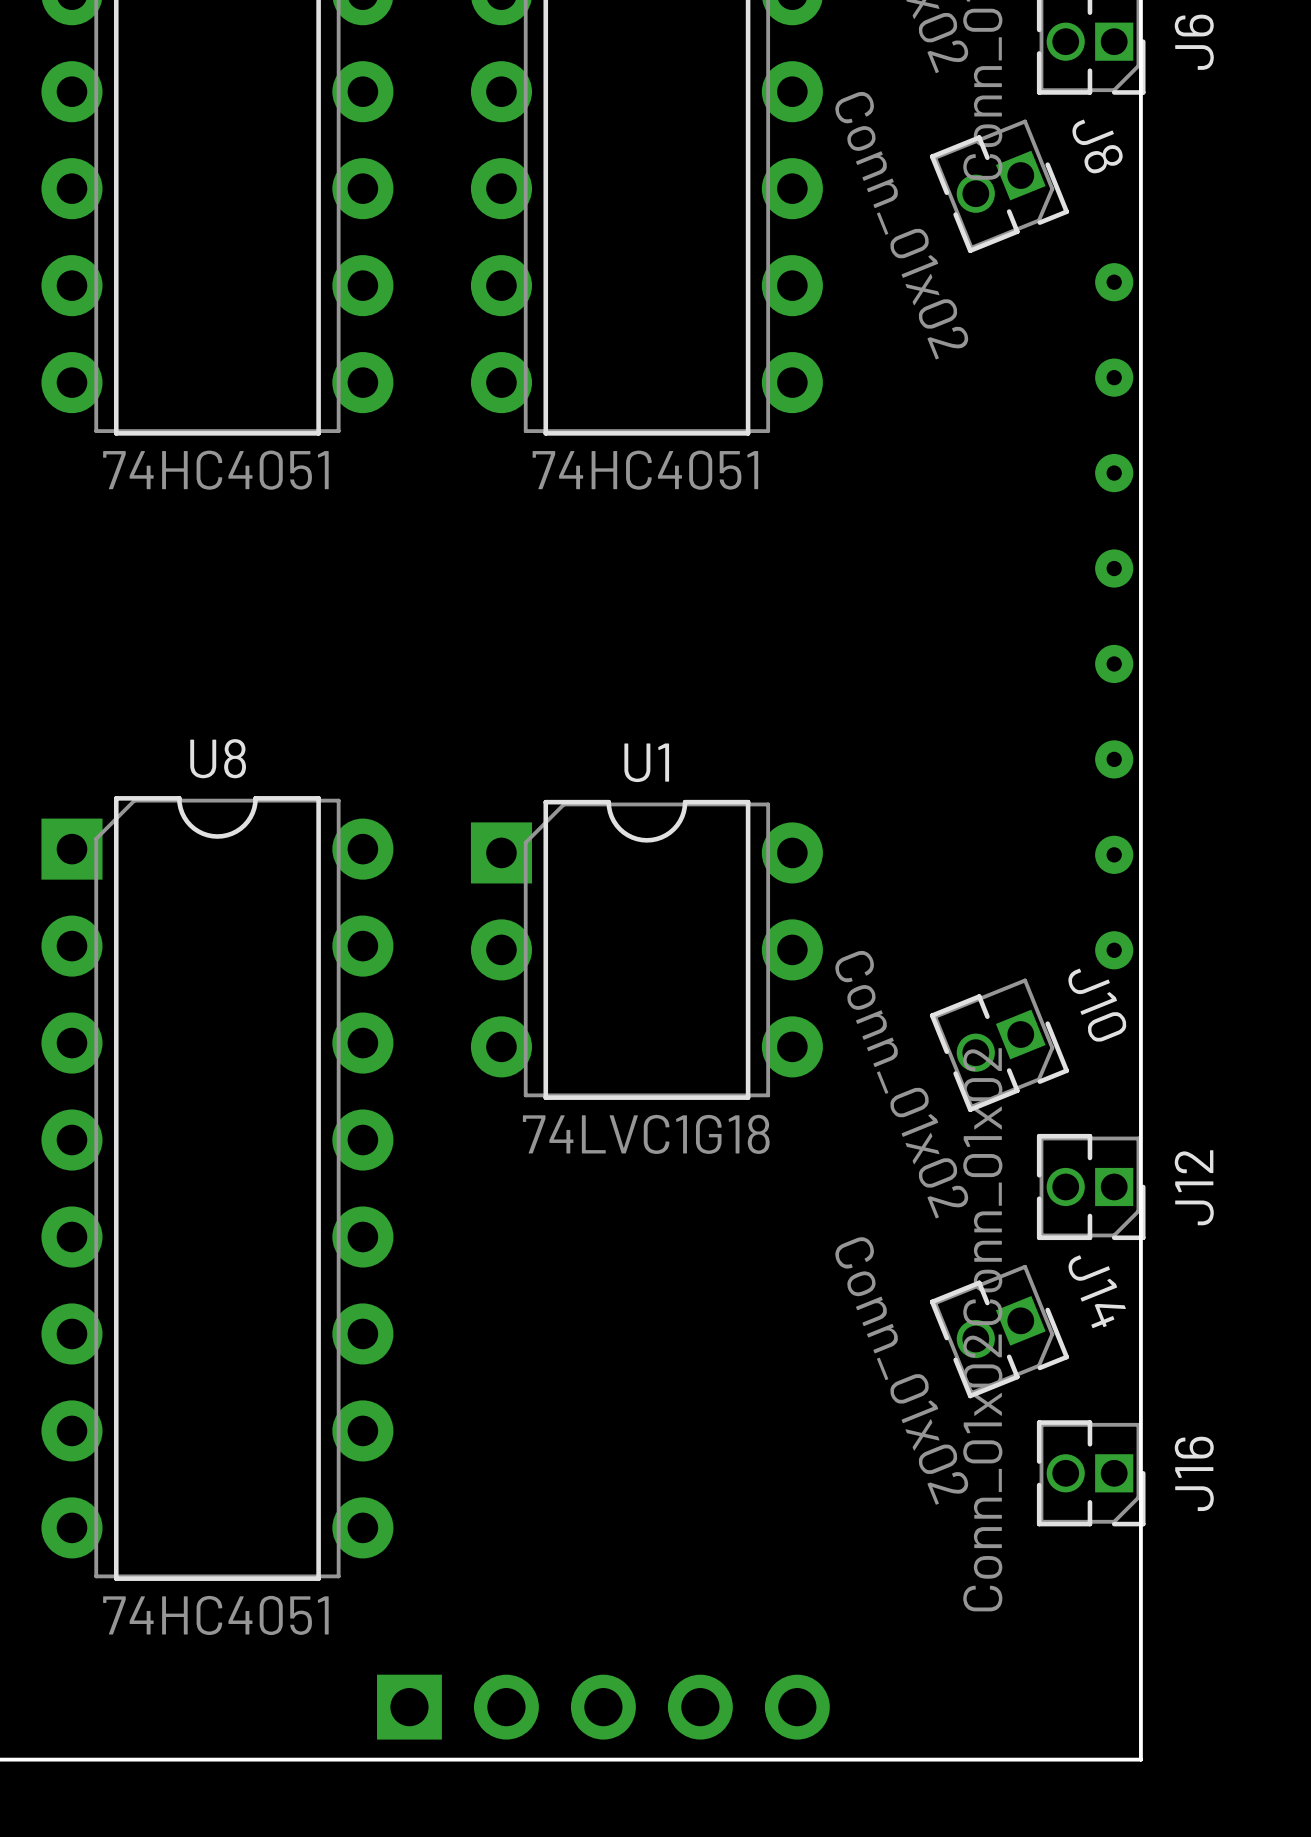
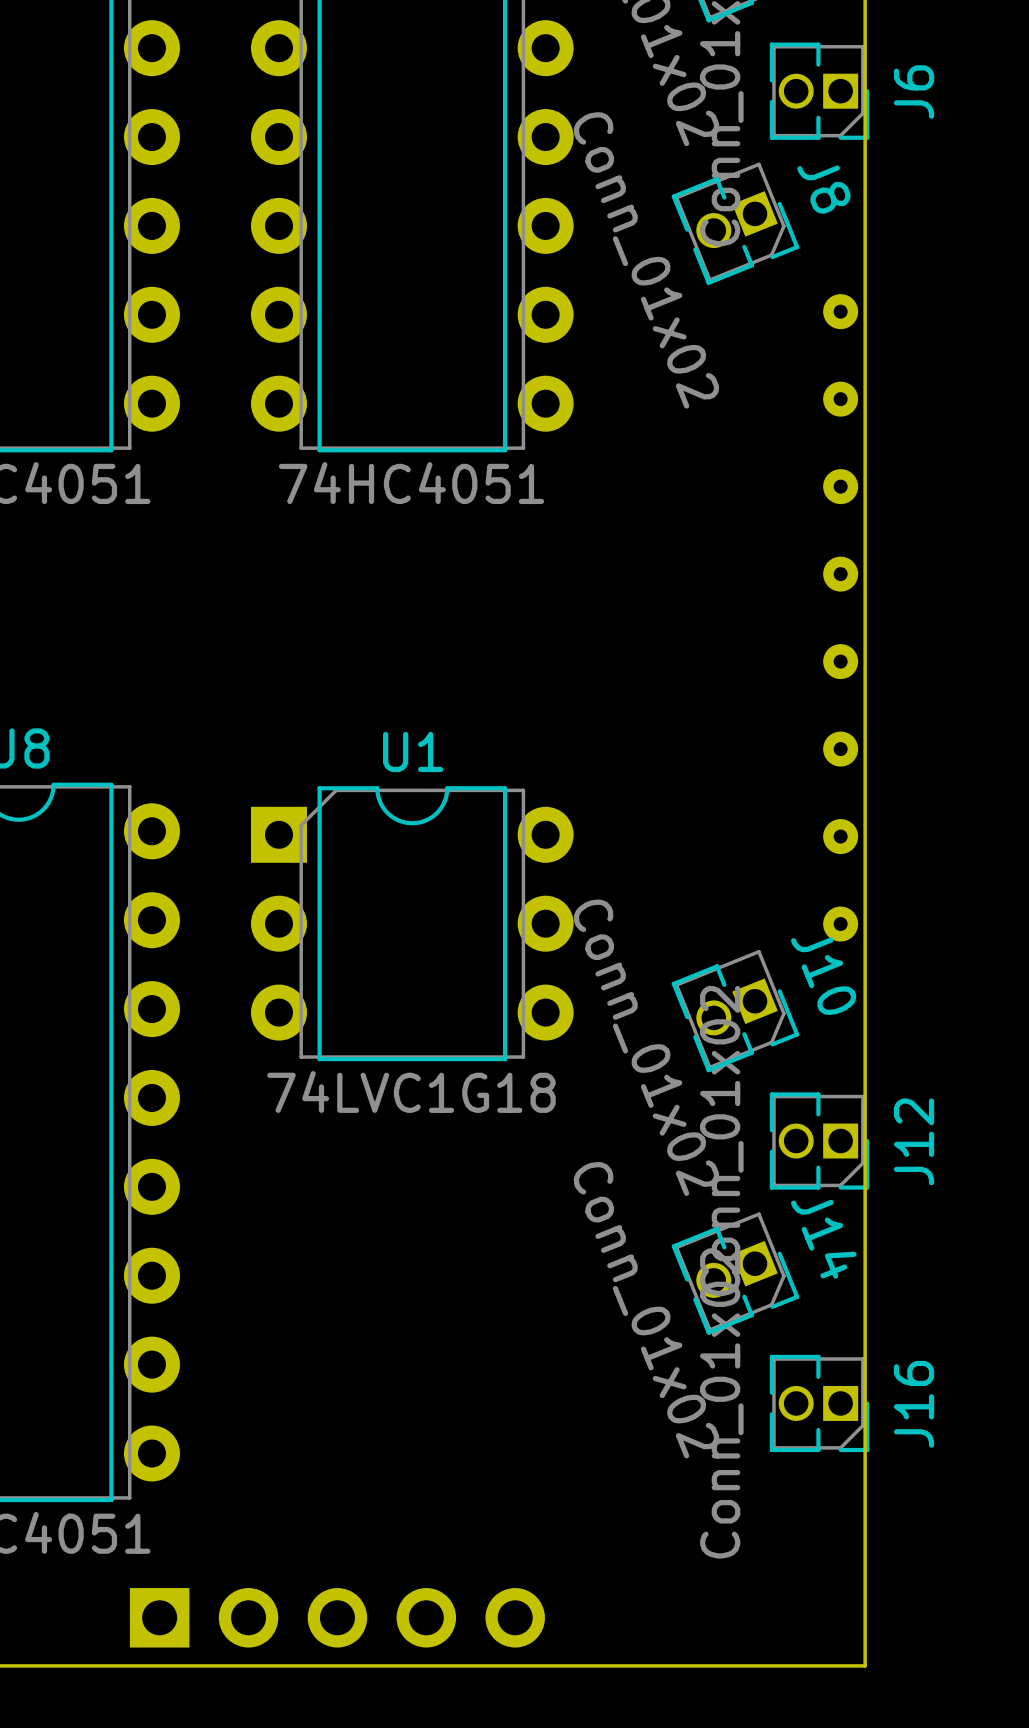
part position: (603, 1707) -> (337, 1617)

